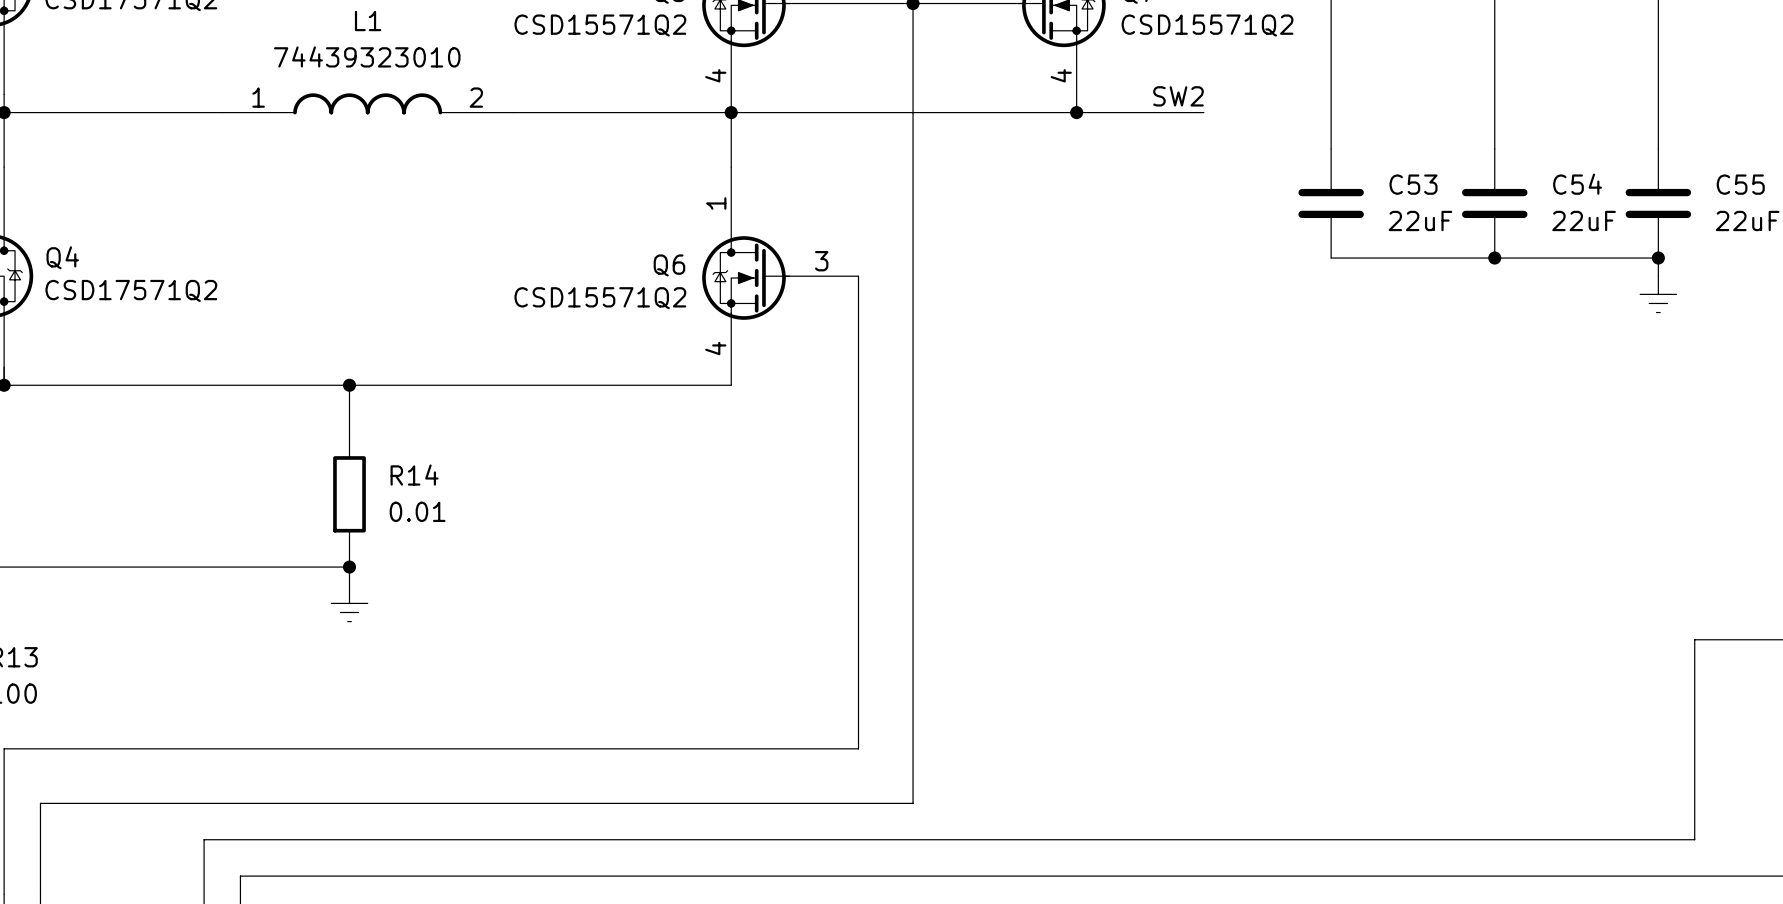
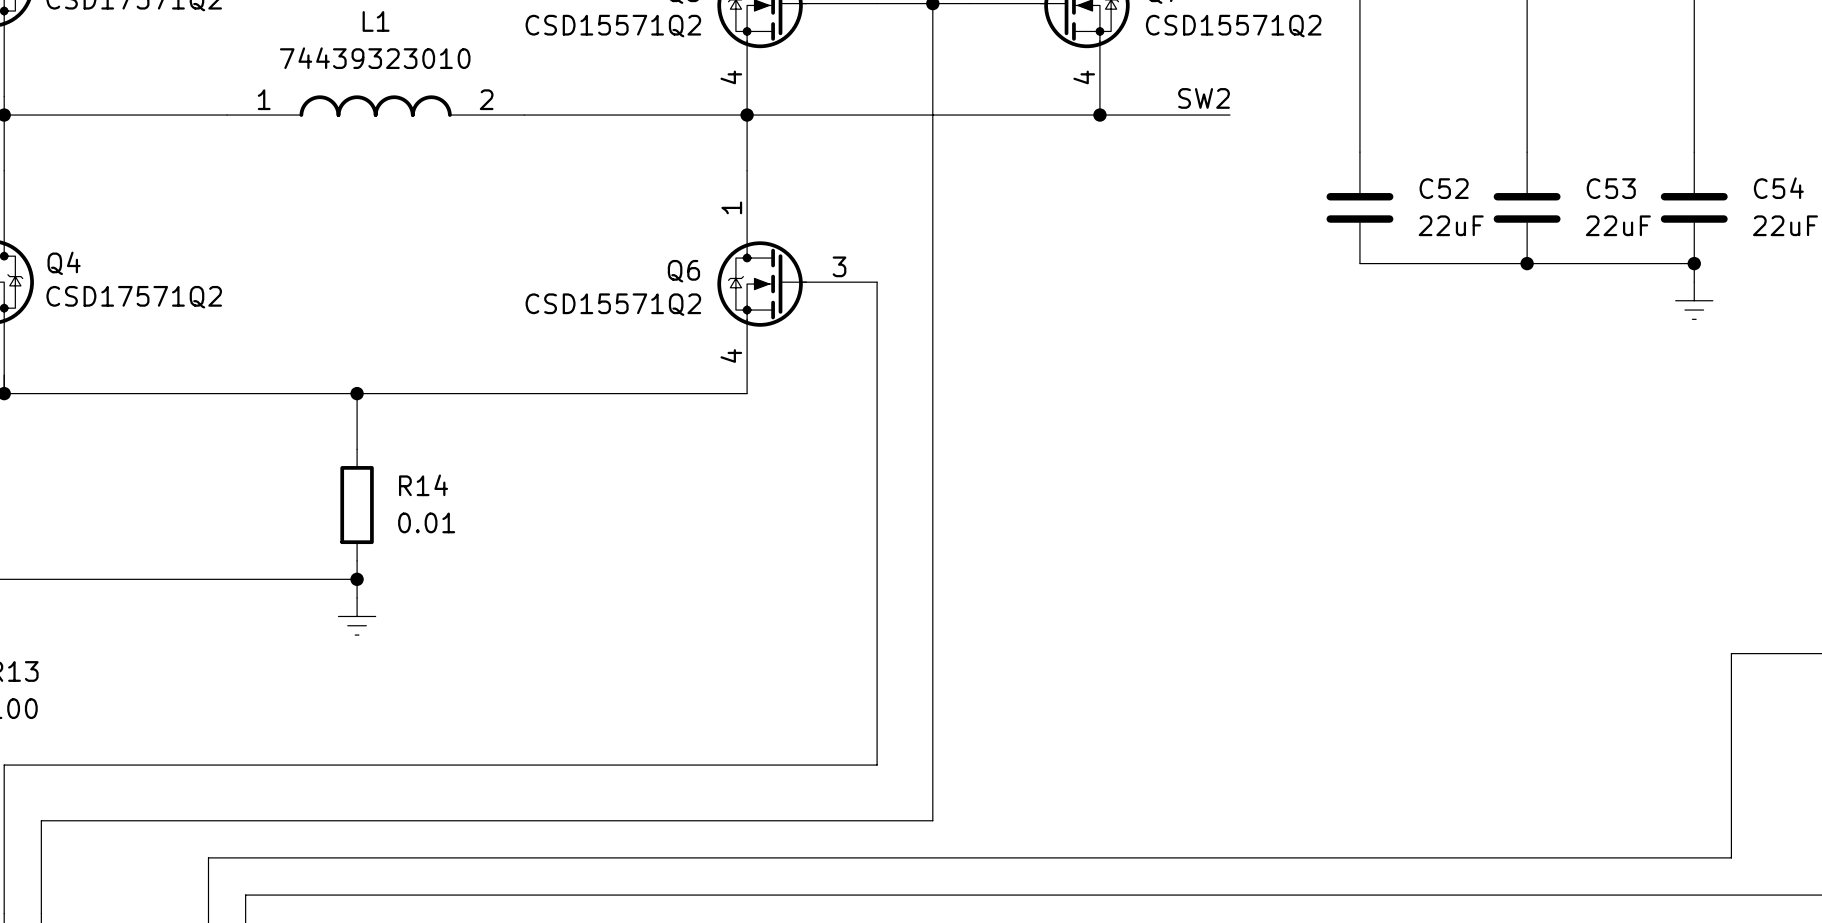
C53 name: C53 (1413, 184) -> C52 (1444, 188)
C54 name: C54 (1577, 184) -> C53 (1611, 188)
C55 name: C55 (1740, 184) -> C54 (1778, 188)

